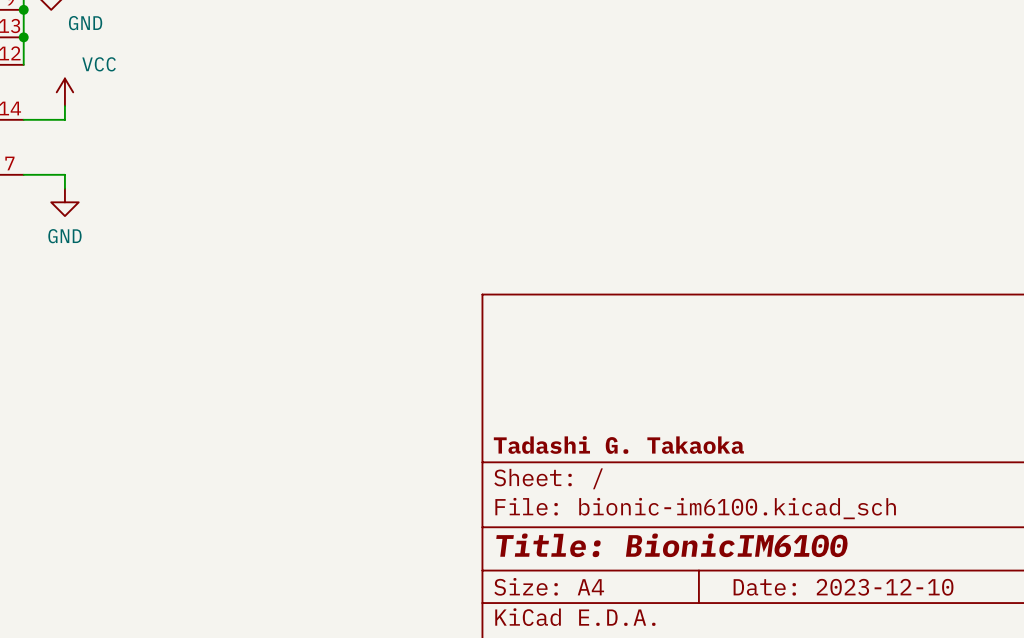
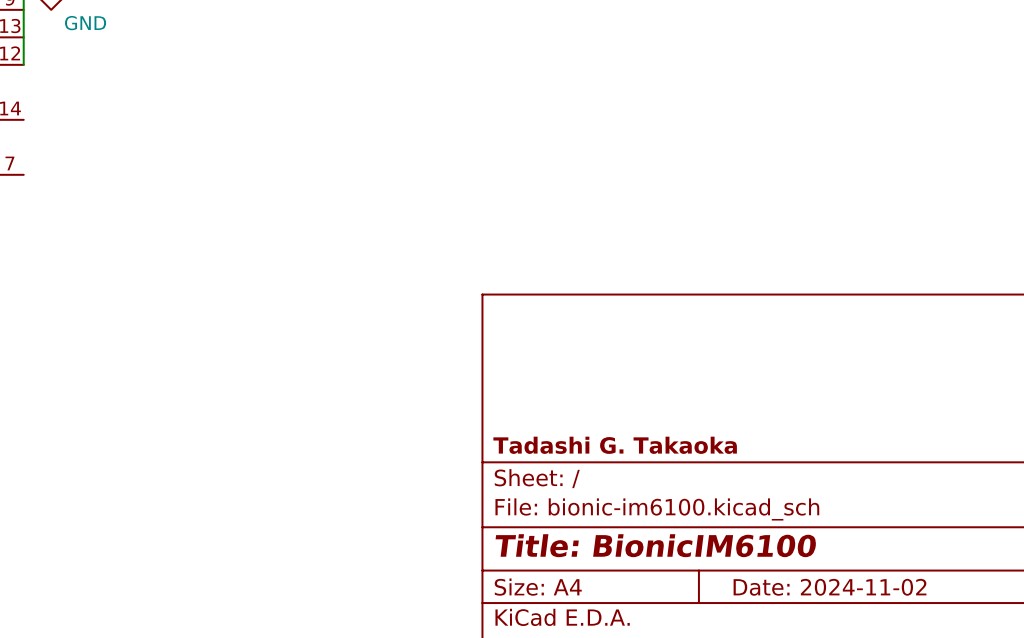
junction: (23, 9) -> none
junction: (23, 37) -> none
power symbol: VCC (64, 92) -> none
wire: (64, 106) (64, 119) (23, 119) -> none
wire: (23, 174) (64, 174) (64, 188) -> none
power symbol: GND (64, 202) -> none
title block: Date: 2023-12-10 (843, 587) -> Date: 2024-11-02 (830, 587)

